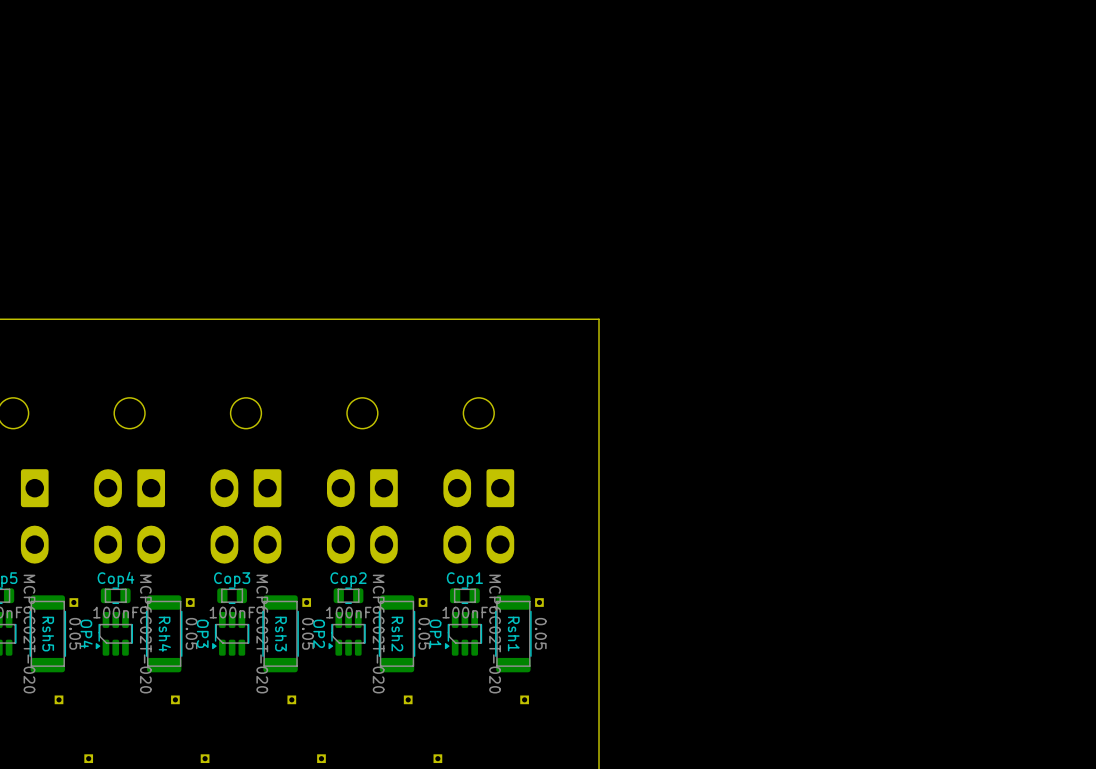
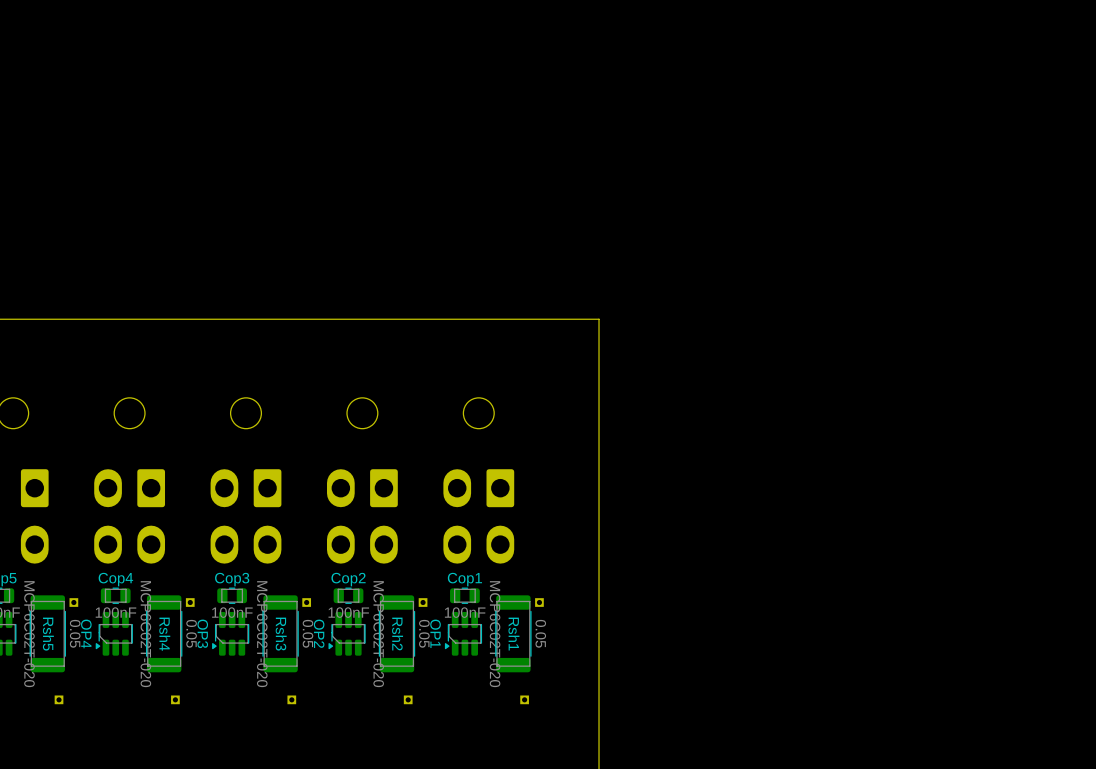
part: (88, 758) -> none
part: (205, 758) -> none
part: (321, 758) -> none
part: (437, 758) -> none

